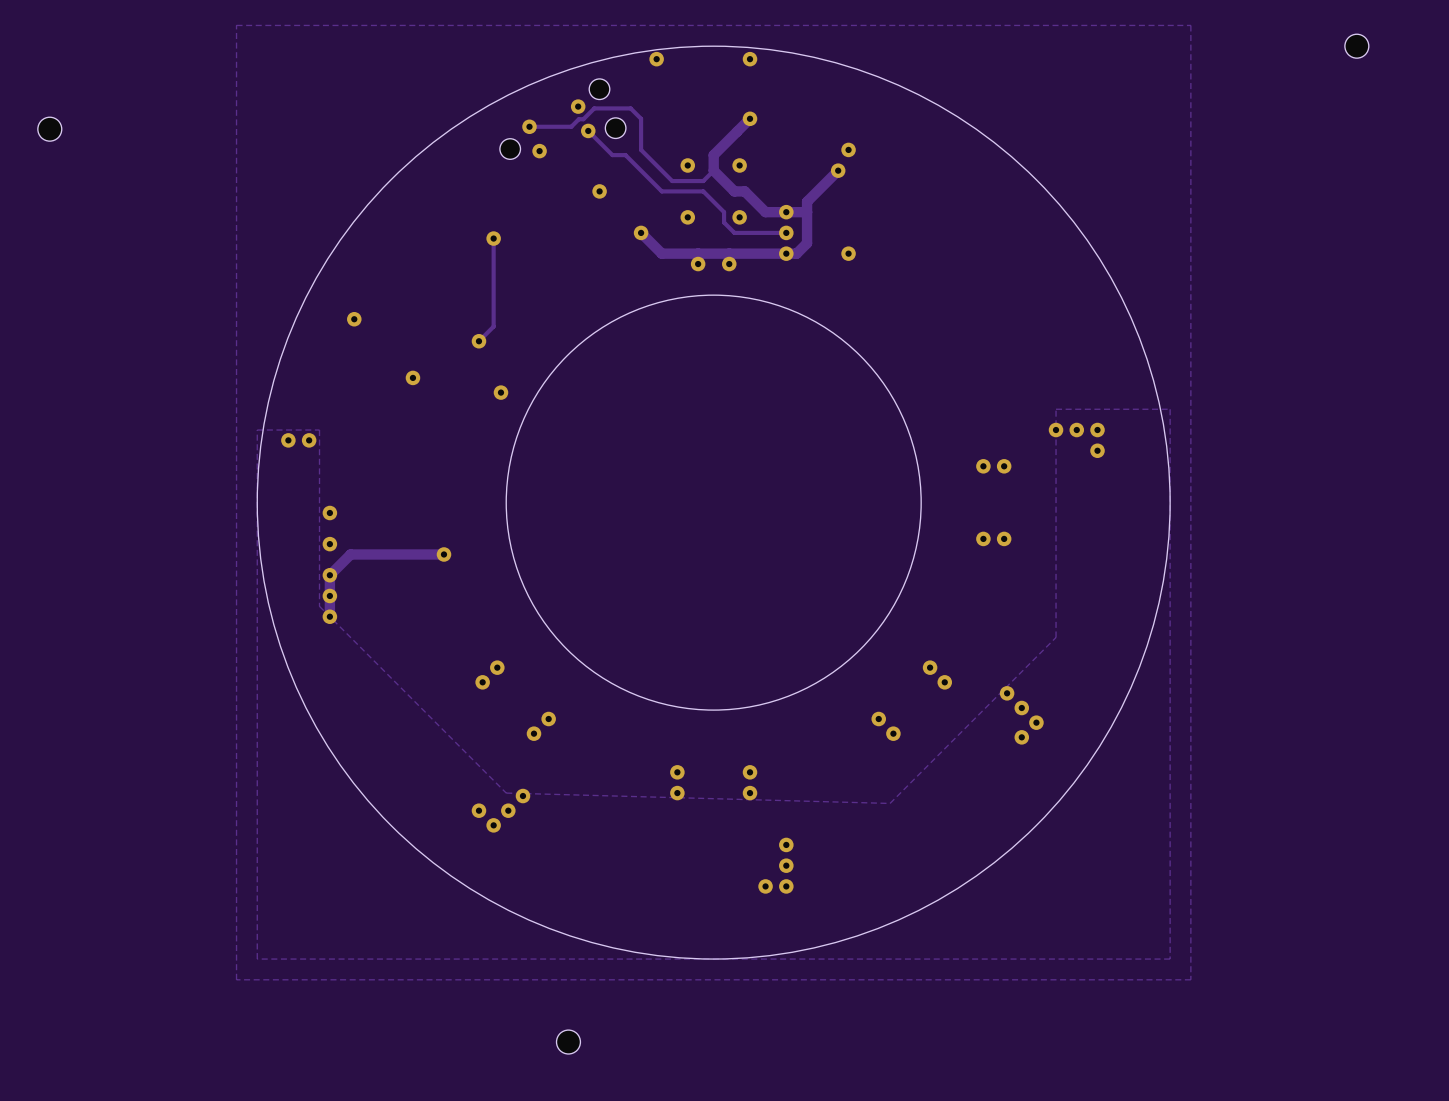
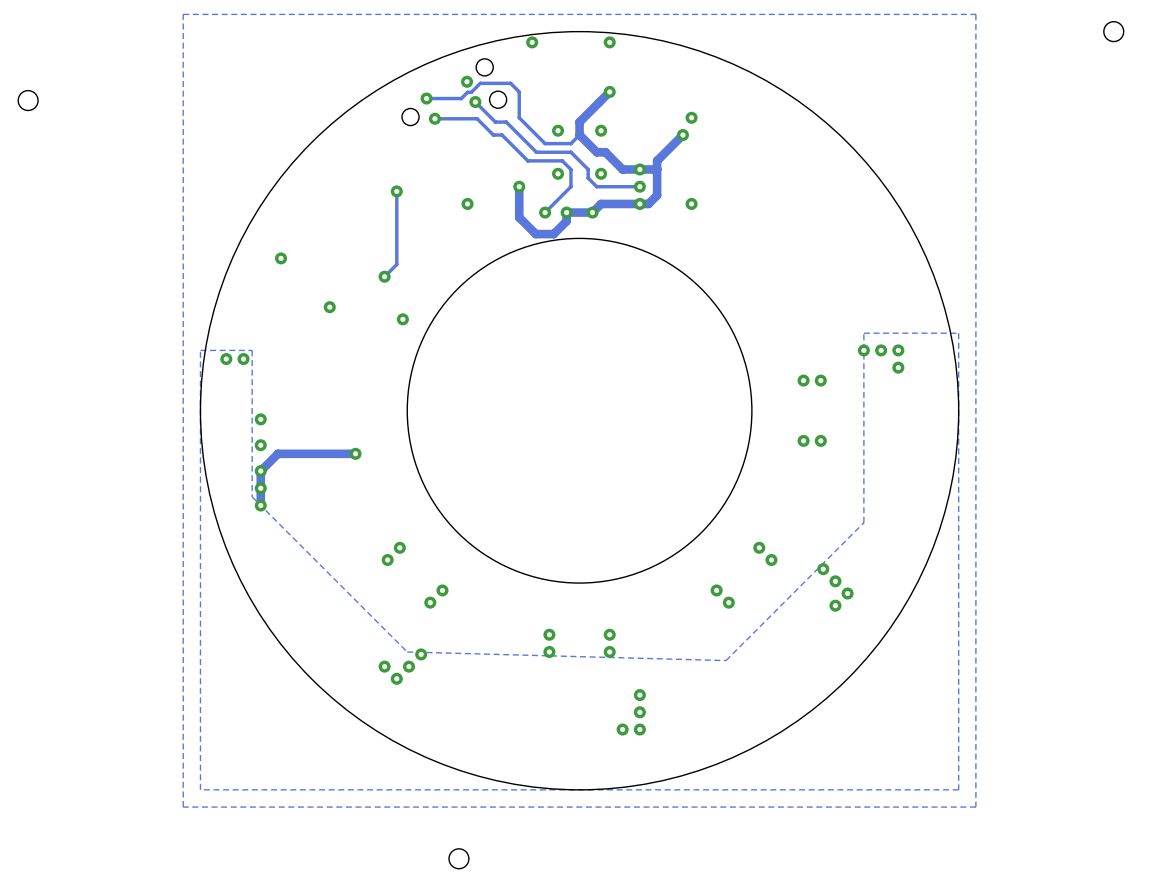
track: none -> (434, 118) (477, 118) (493, 135) (502, 135) (527, 160) (562, 160) (570, 169) (570, 186) (545, 212)
via: (599, 191) -> none
track: (641, 232) (661, 253) (739, 253) -> (519, 186) (519, 217) (535, 234) (553, 234) (566, 221) (566, 212) (592, 212) (601, 203)
via: none -> (467, 203)
via: none -> (545, 212)

